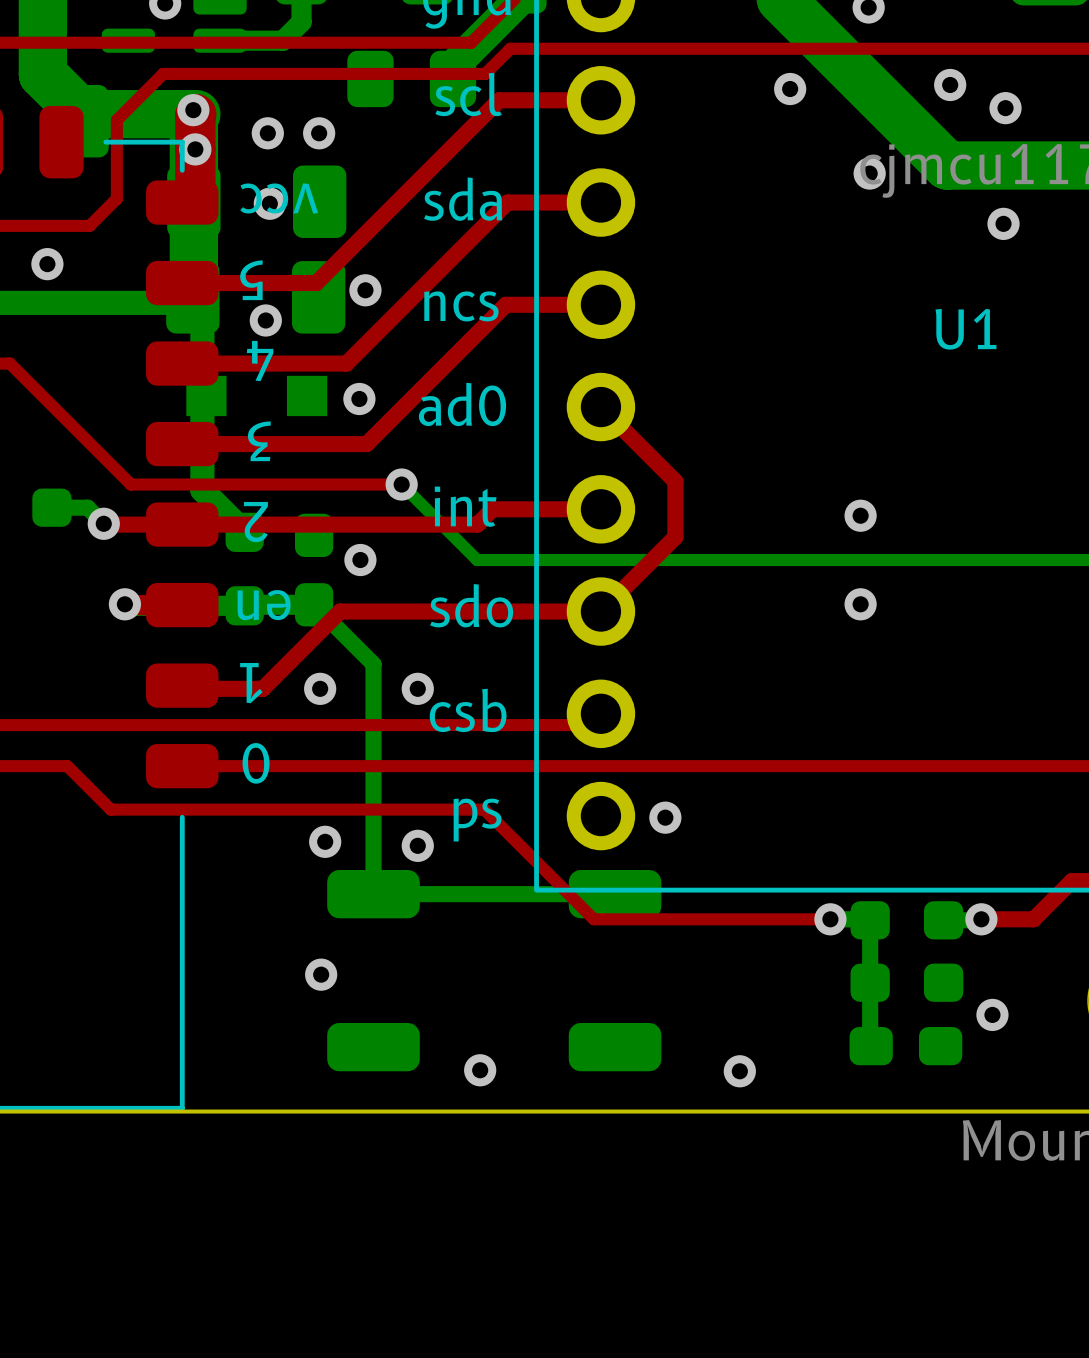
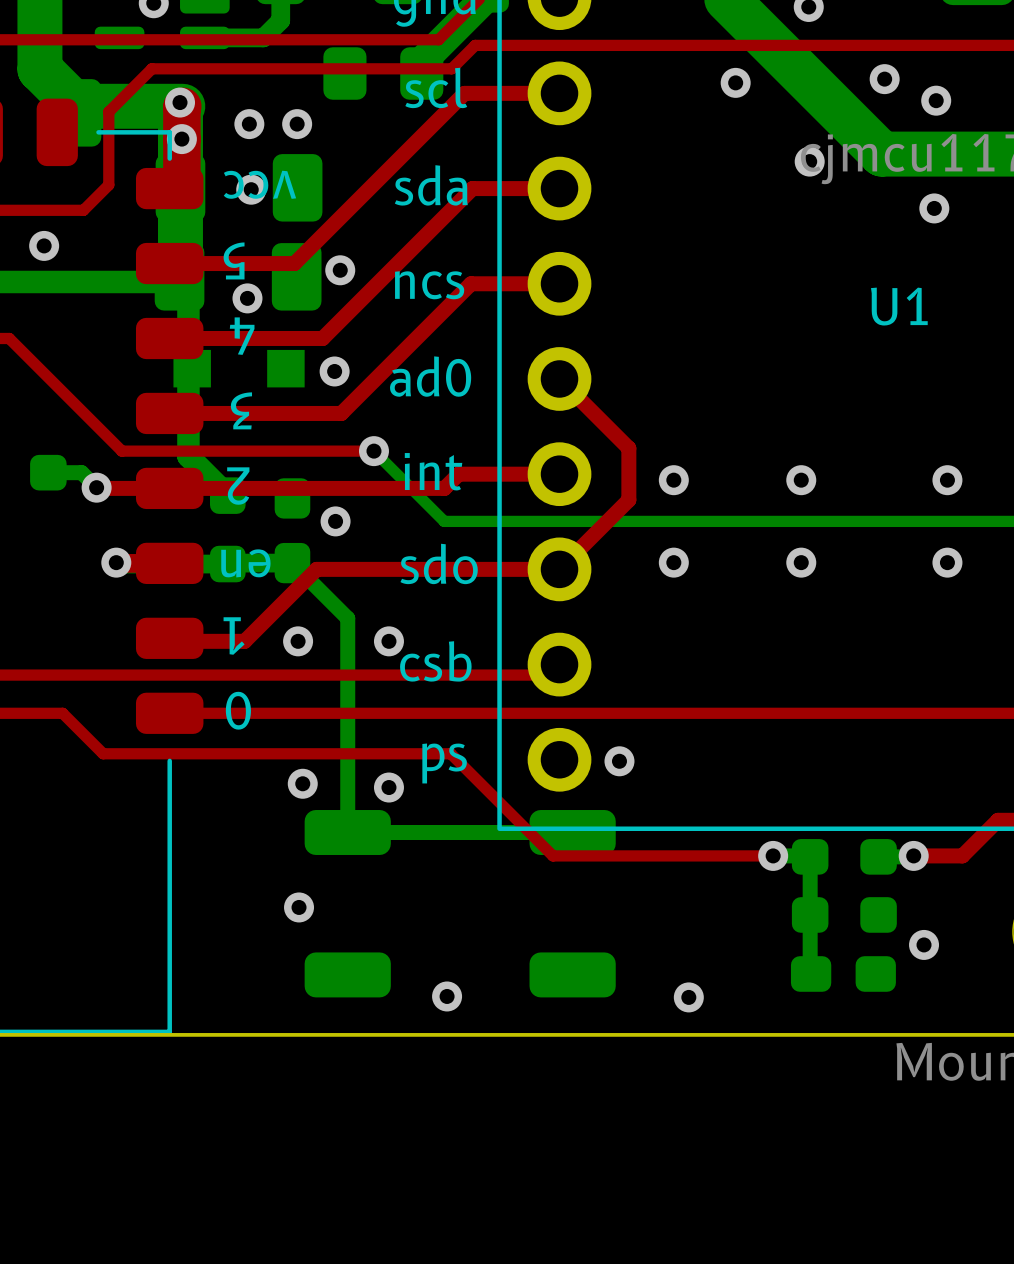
via: none -> (673, 480)
via: none -> (947, 480)
via: none -> (673, 562)
via: none -> (947, 562)

